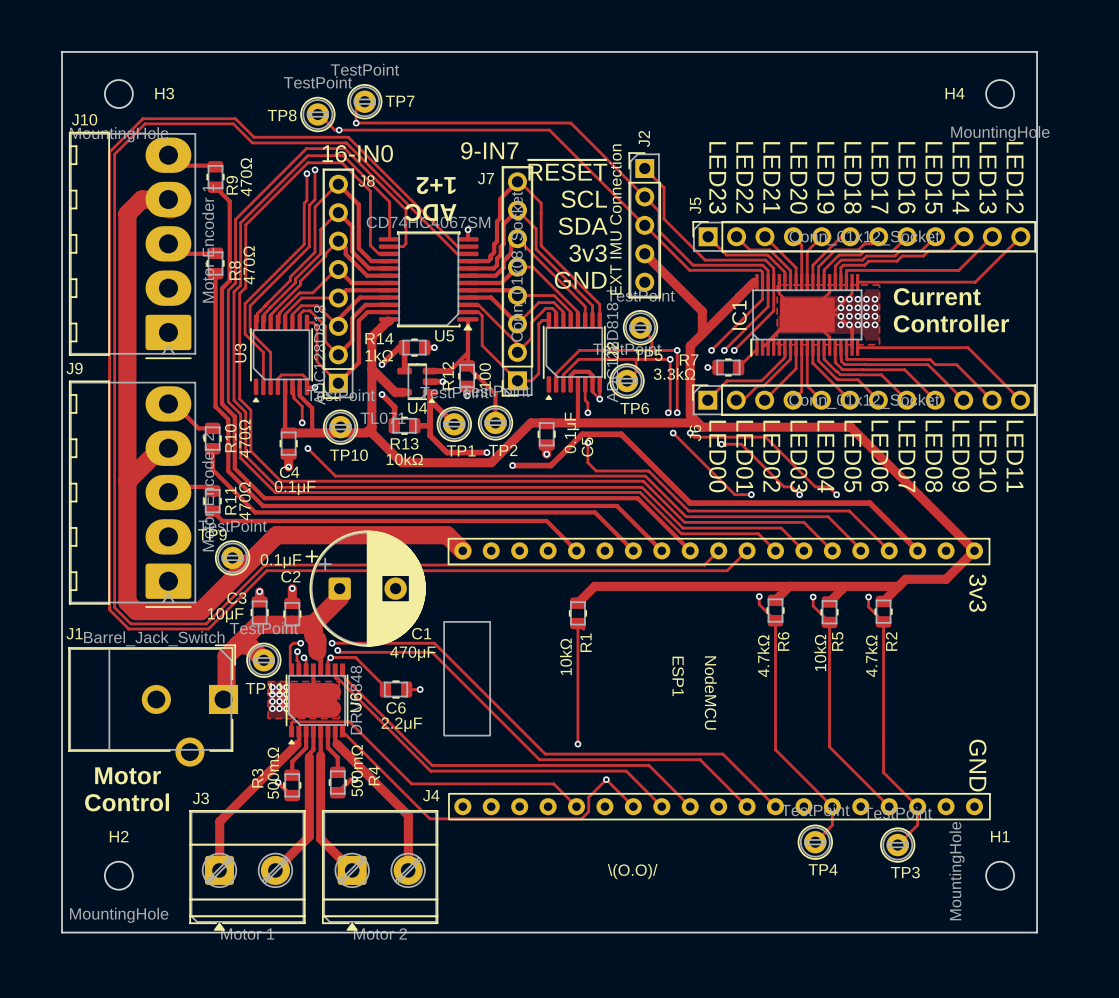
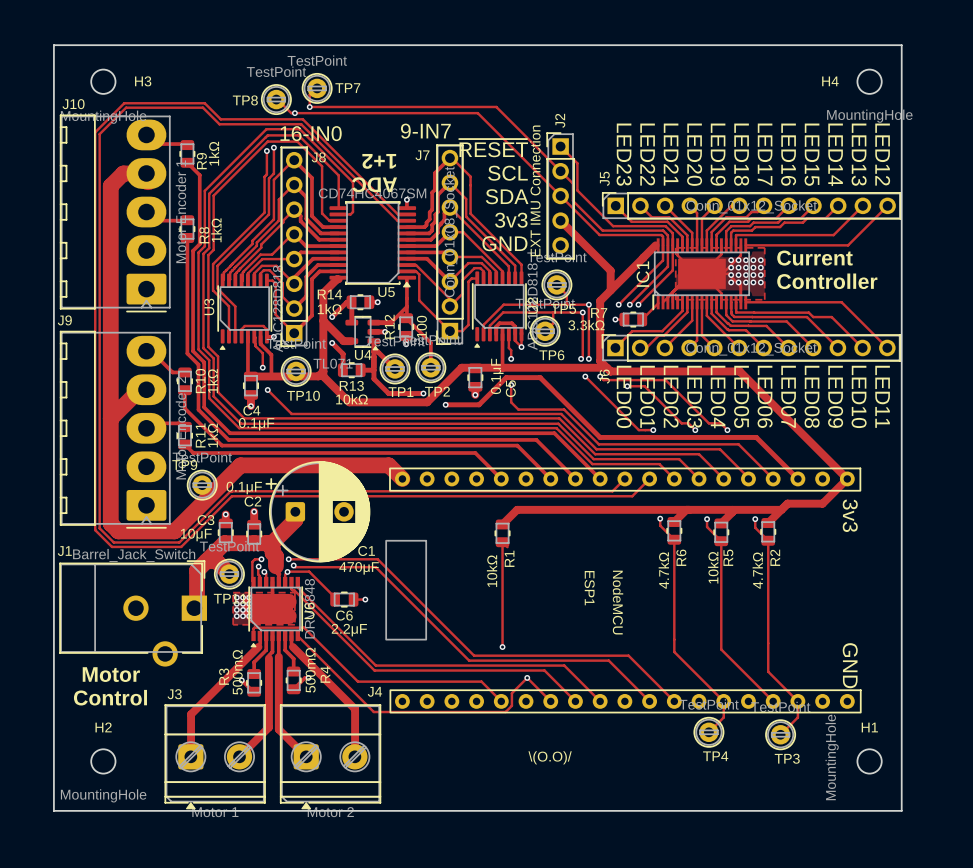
R9 value: 470Ω (246, 177) -> 1kΩ (213, 153)
R8 value: 470Ω (249, 265) -> 1kΩ (216, 230)
R10 value: 470Ω (244, 438) -> 1kΩ (212, 381)
R11 value: 470Ω (244, 501) -> 1kΩ (212, 435)

